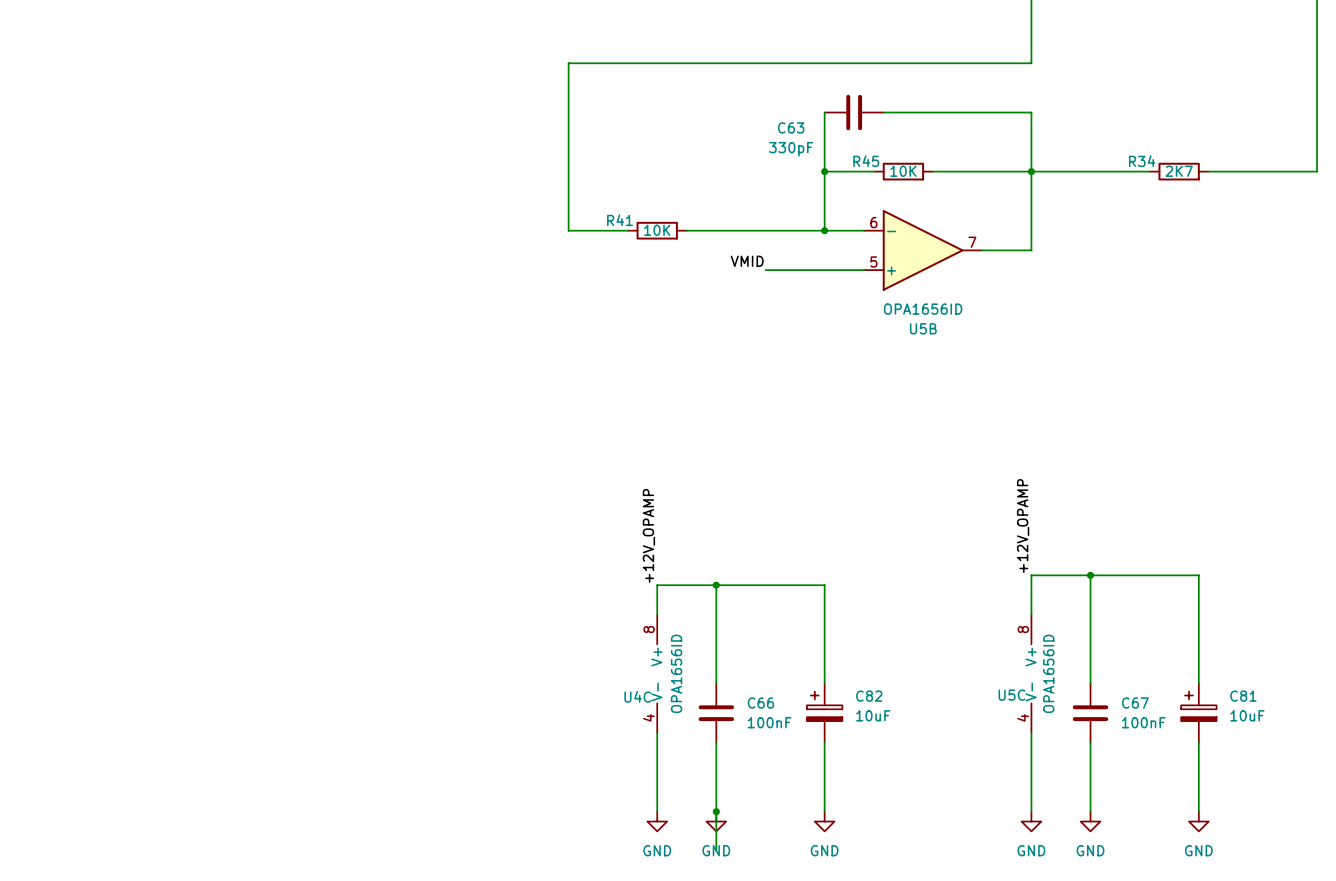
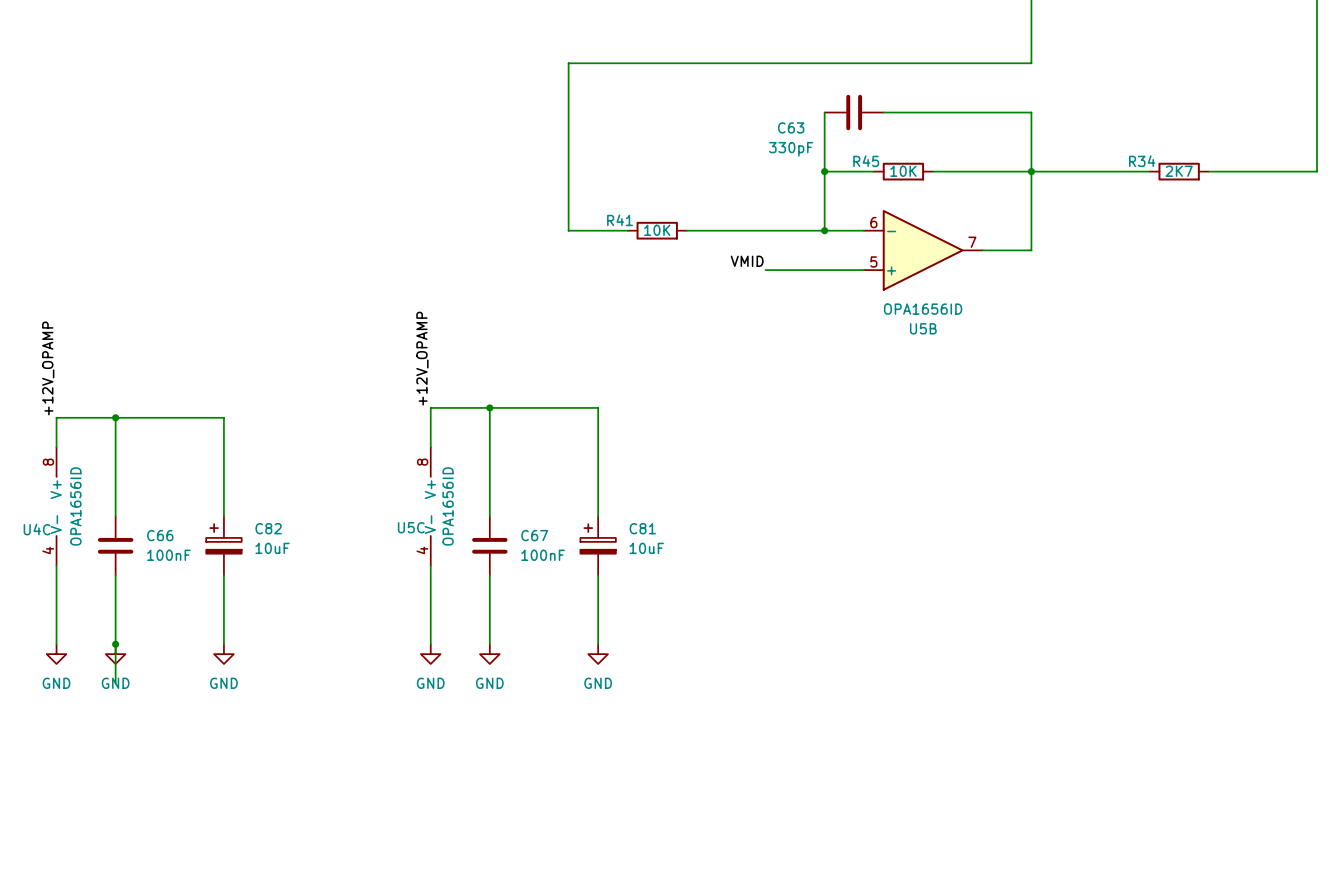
label: none -> +12V_OPAMP (422, 358)
label: none -> +12V_OPAMP (48, 368)
wire: none -> (489, 407) (489, 516)
junction: none -> (489, 407)
wire: none -> (115, 417) (115, 516)
junction: none -> (115, 417)
wire: none -> (56, 447) (56, 417) (223, 417) (223, 516)
wire: none -> (430, 447) (430, 407) (598, 407) (598, 516)
label: +12V_OPAMP (1023, 526) -> none
label: +12V_OPAMP (648, 535) -> none
wire: none -> (56, 565) (56, 644)
wire: none -> (430, 565) (430, 644)
wire: none -> (115, 575) (115, 683)
wire: none -> (223, 575) (223, 644)
wire: none -> (489, 575) (489, 644)
wire: none -> (598, 575) (598, 644)
wire: (1090, 575) (1090, 683) -> none
junction: (1090, 575) -> none
wire: (716, 585) (716, 683) -> none
junction: (716, 585) -> none
wire: (657, 614) (657, 585) (824, 585) (824, 683) -> none
wire: (1031, 614) (1031, 575) (1198, 575) (1198, 683) -> none
junction: none -> (115, 644)
power symbol: none -> GND (56, 654)
power symbol: none -> GND (115, 654)
power symbol: none -> GND (223, 654)
power symbol: none -> GND (430, 654)
power symbol: none -> GND (489, 654)
power symbol: none -> GND (598, 654)
U4C position: (657, 673) -> (56, 506)
U5C position: (1031, 673) -> (430, 506)
C66 position: (716, 713) -> (115, 545)
C82 position: (824, 713) -> (223, 545)
C67 position: (1090, 713) -> (489, 545)
C81 position: (1198, 713) -> (598, 545)
wire: (657, 732) (657, 811) -> none
wire: (1031, 732) (1031, 811) -> none
wire: (716, 742) (716, 851) -> none
wire: (824, 742) (824, 811) -> none
wire: (1090, 742) (1090, 811) -> none
wire: (1198, 742) (1198, 811) -> none
junction: (716, 811) -> none
power symbol: GND (657, 821) -> none
power symbol: GND (716, 821) -> none
power symbol: GND (824, 821) -> none
power symbol: GND (1031, 821) -> none
power symbol: GND (1090, 821) -> none
power symbol: GND (1198, 821) -> none

